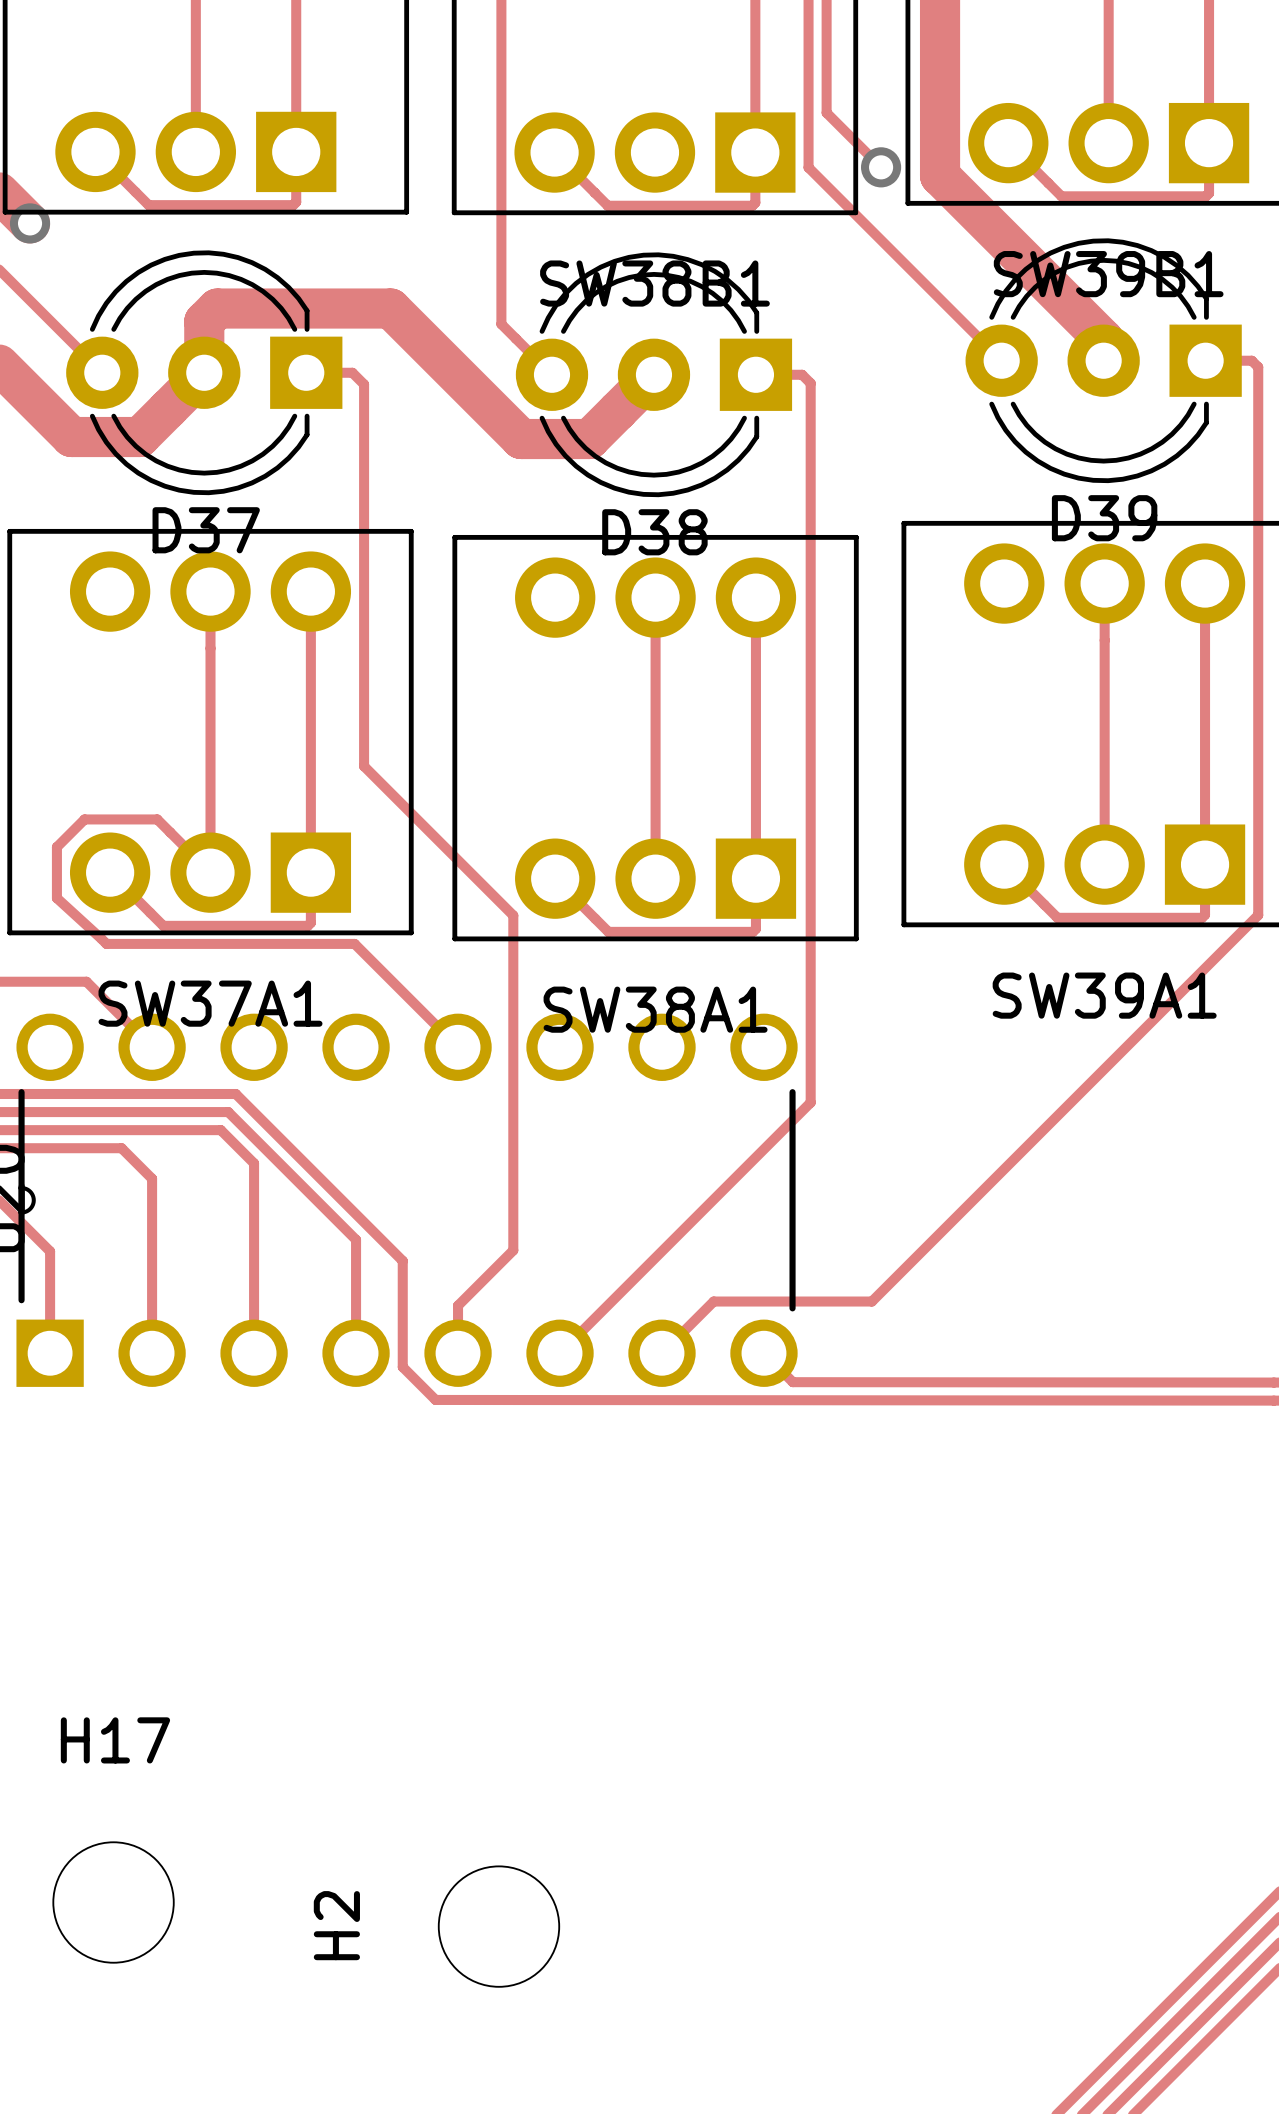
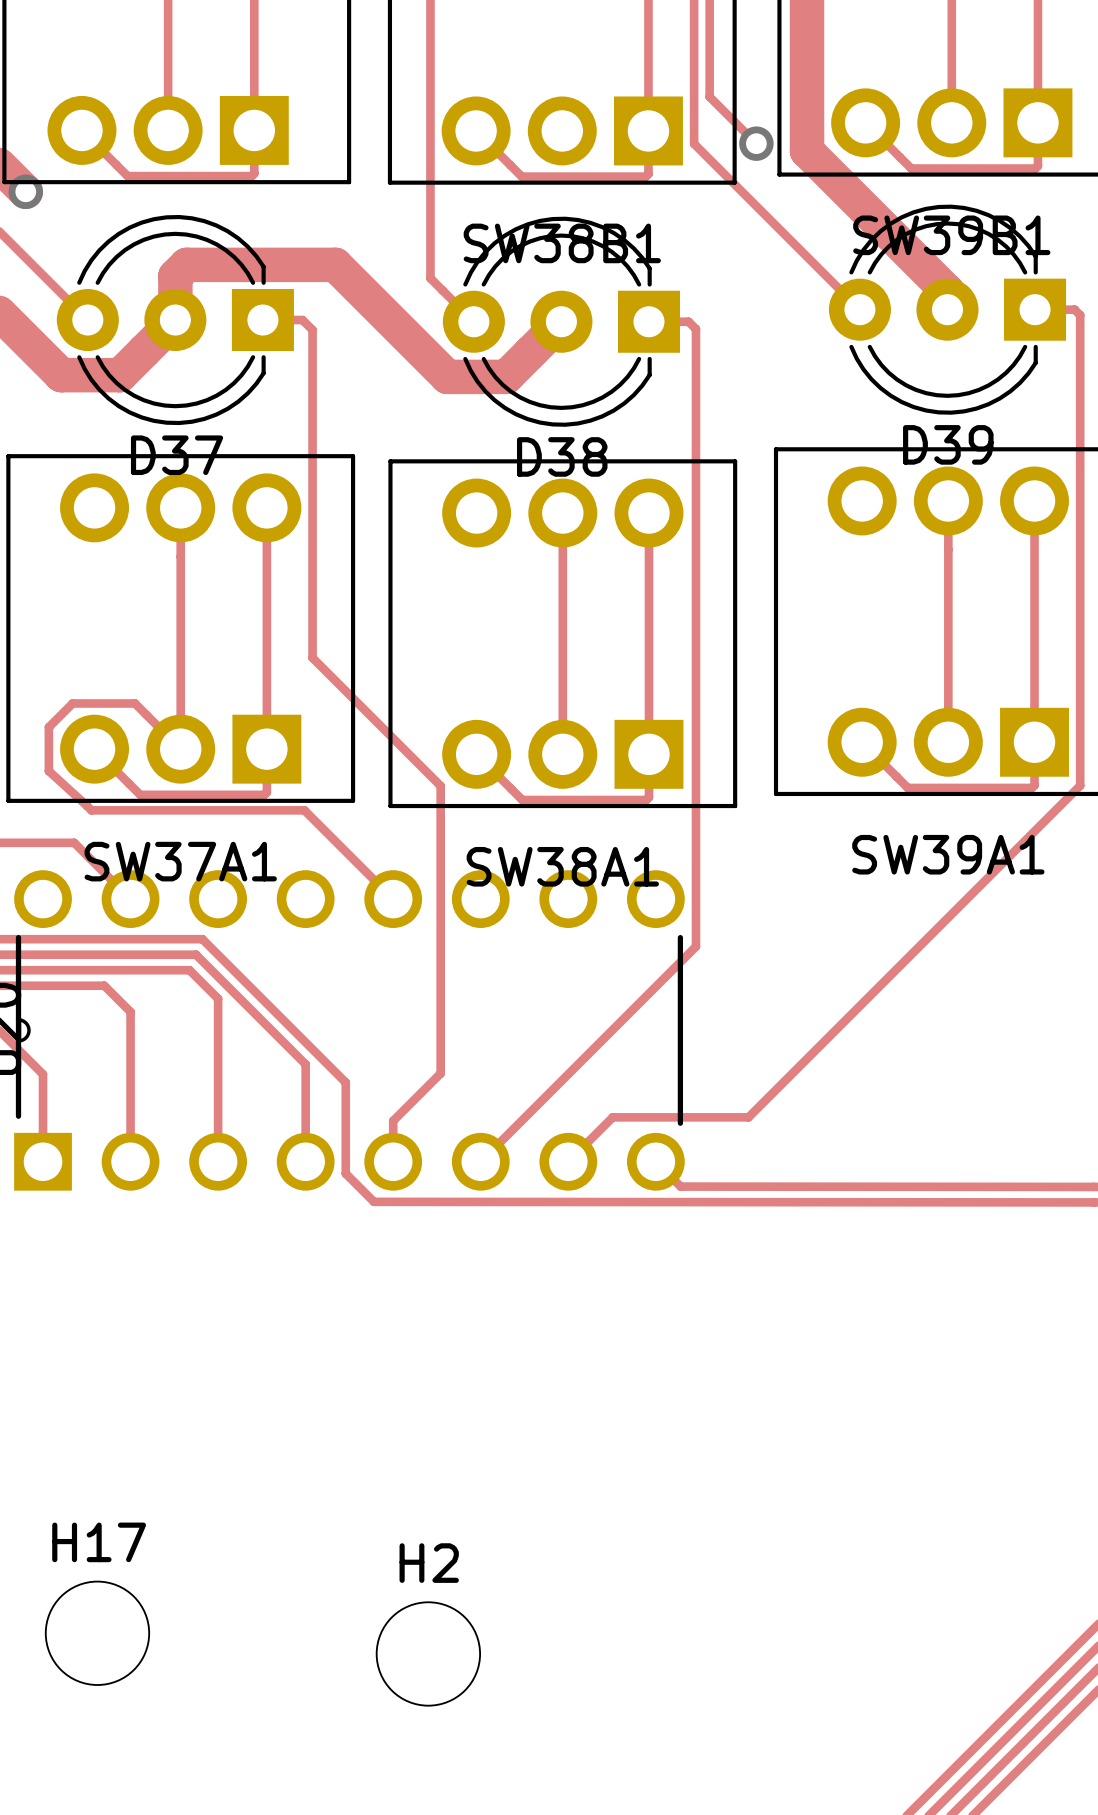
H17 name position: H17 (115, 1740) -> H17 (99, 1542)
H2 name rotation: 0° (336, 1925) -> 90° clockwise (429, 1563)
H2 name position: H2 (336, 1925) -> H2 (429, 1563)

